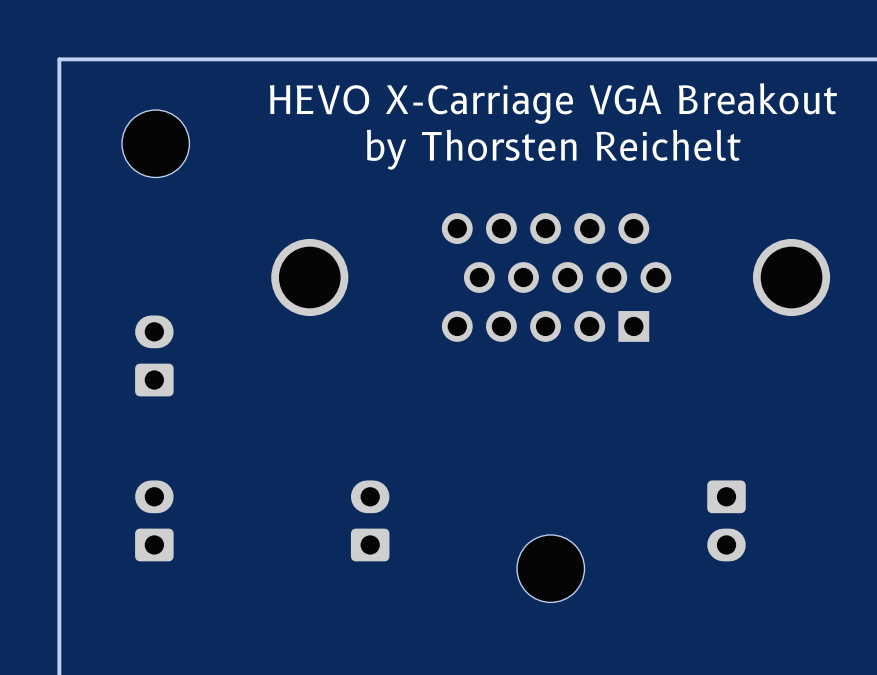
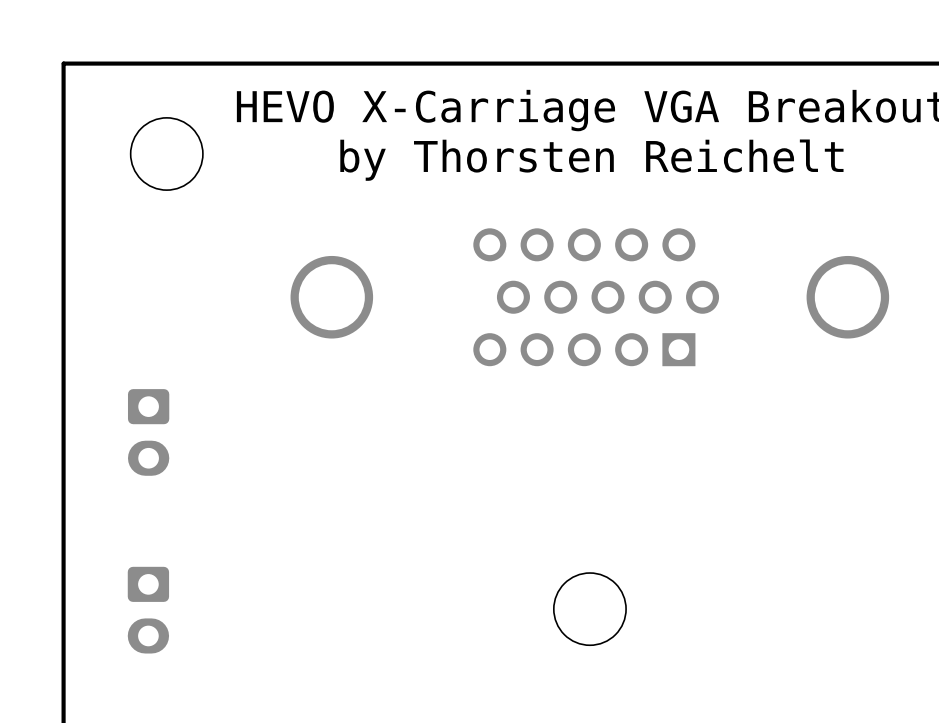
part rotation: 0° (154, 355) -> 180° (148, 432)
part position: (154, 355) -> (148, 432)
part rotation: 0° (154, 520) -> 180° (148, 610)
part position: (154, 520) -> (148, 610)
part: (370, 520) -> none
part: (726, 520) -> none

